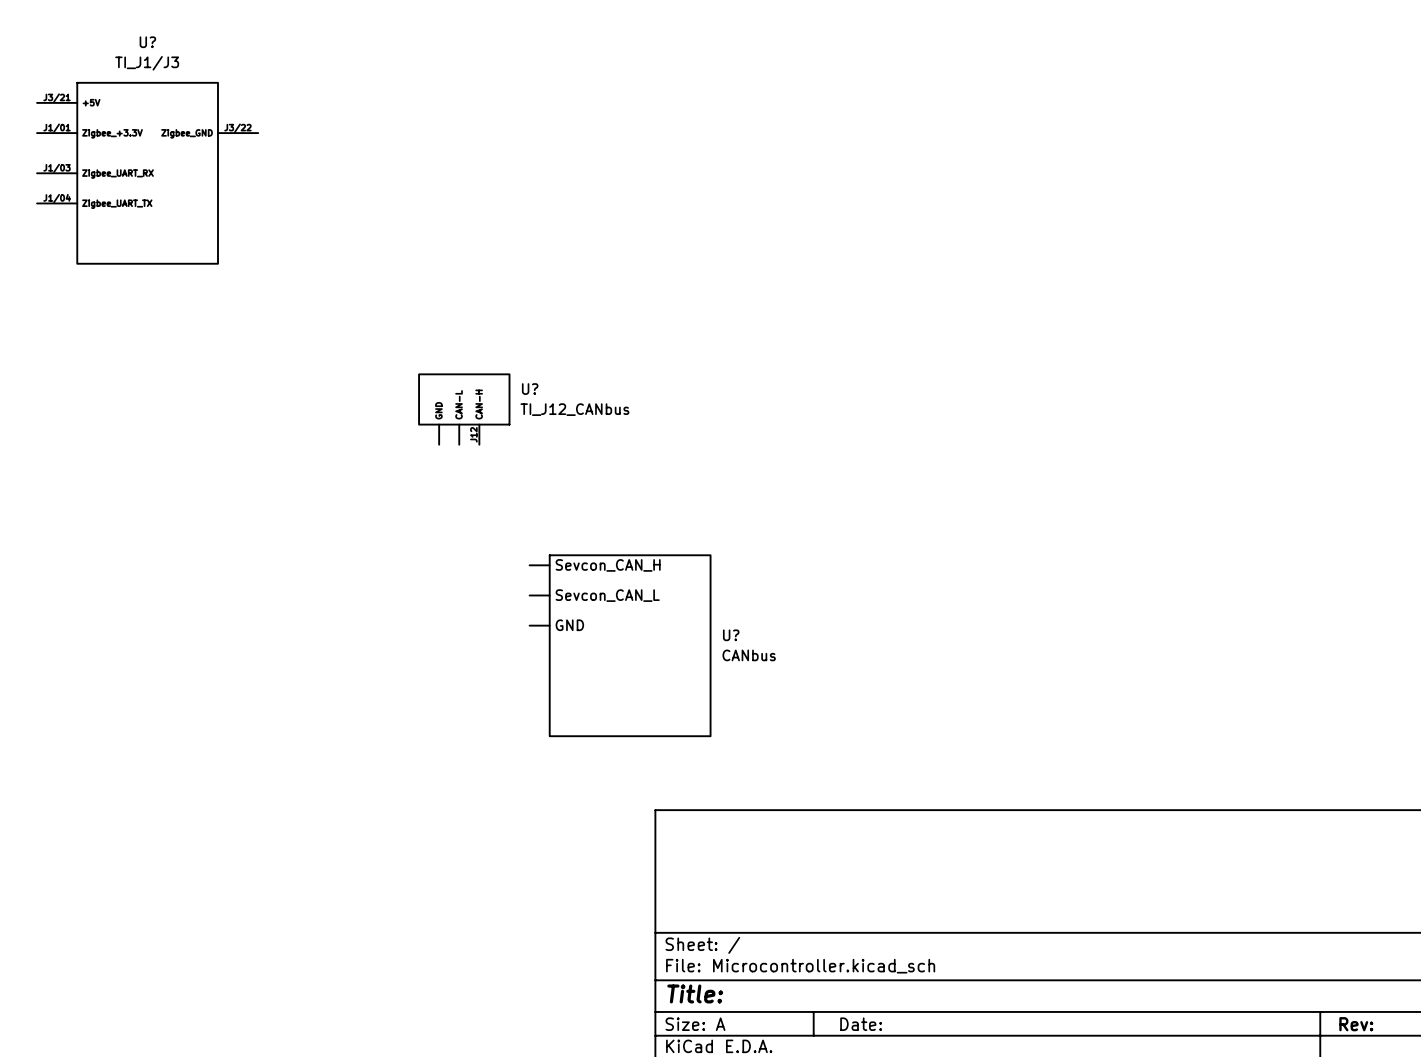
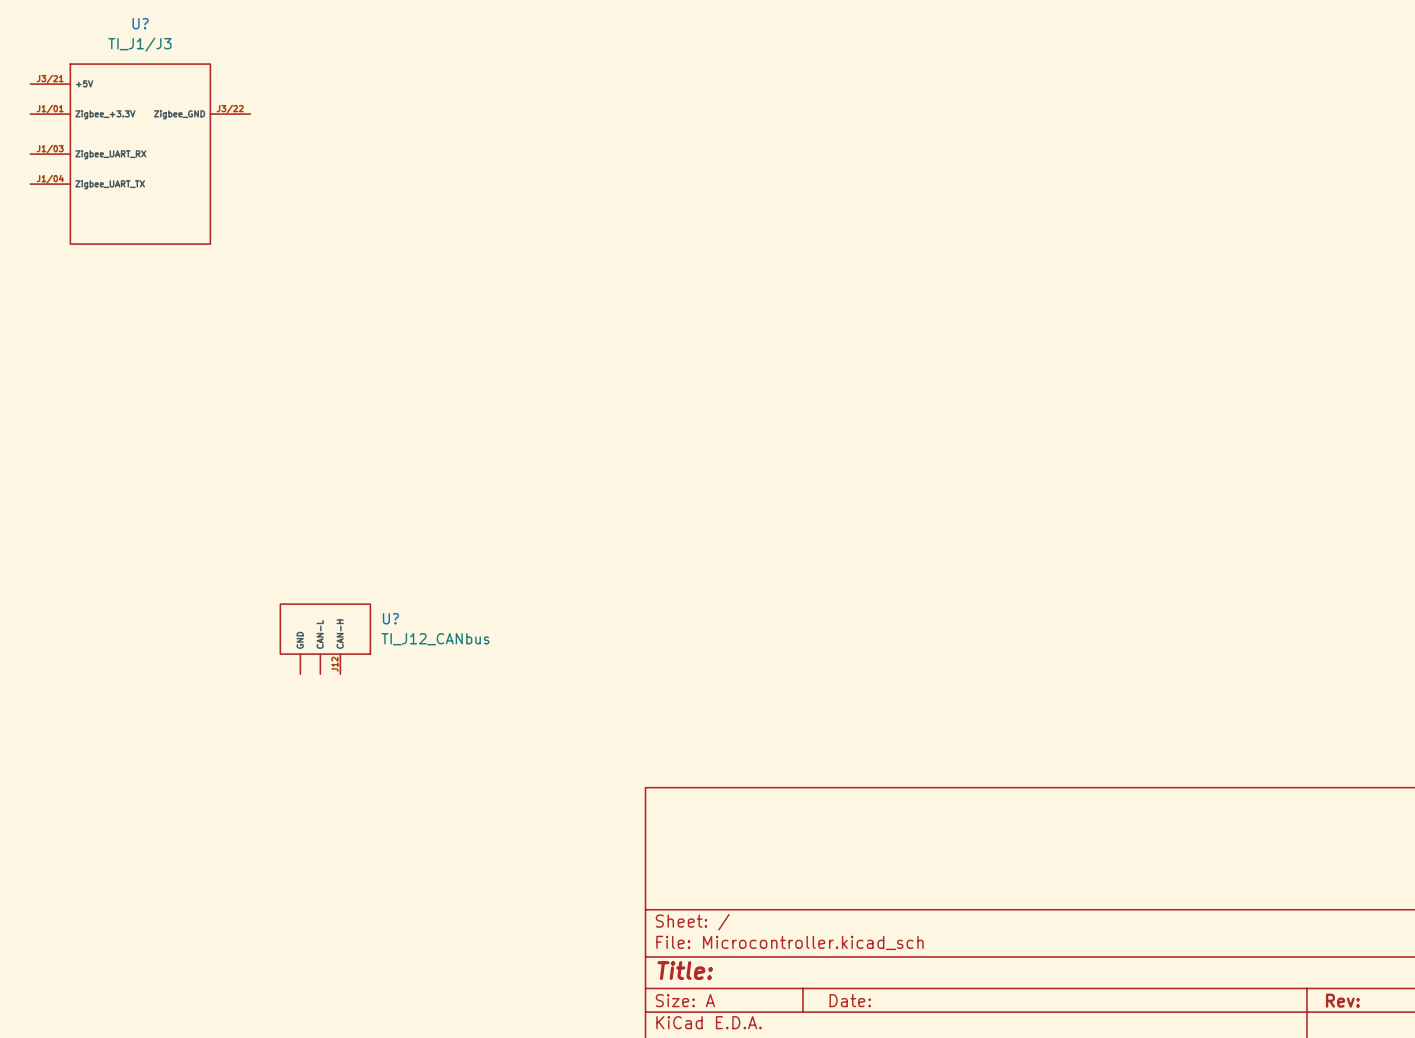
U?: TI_J12_CANbus (464, 409) -> none
U?: CANbus (620, 645) -> none
U?: none -> TI_J12_CANbus (325, 639)

